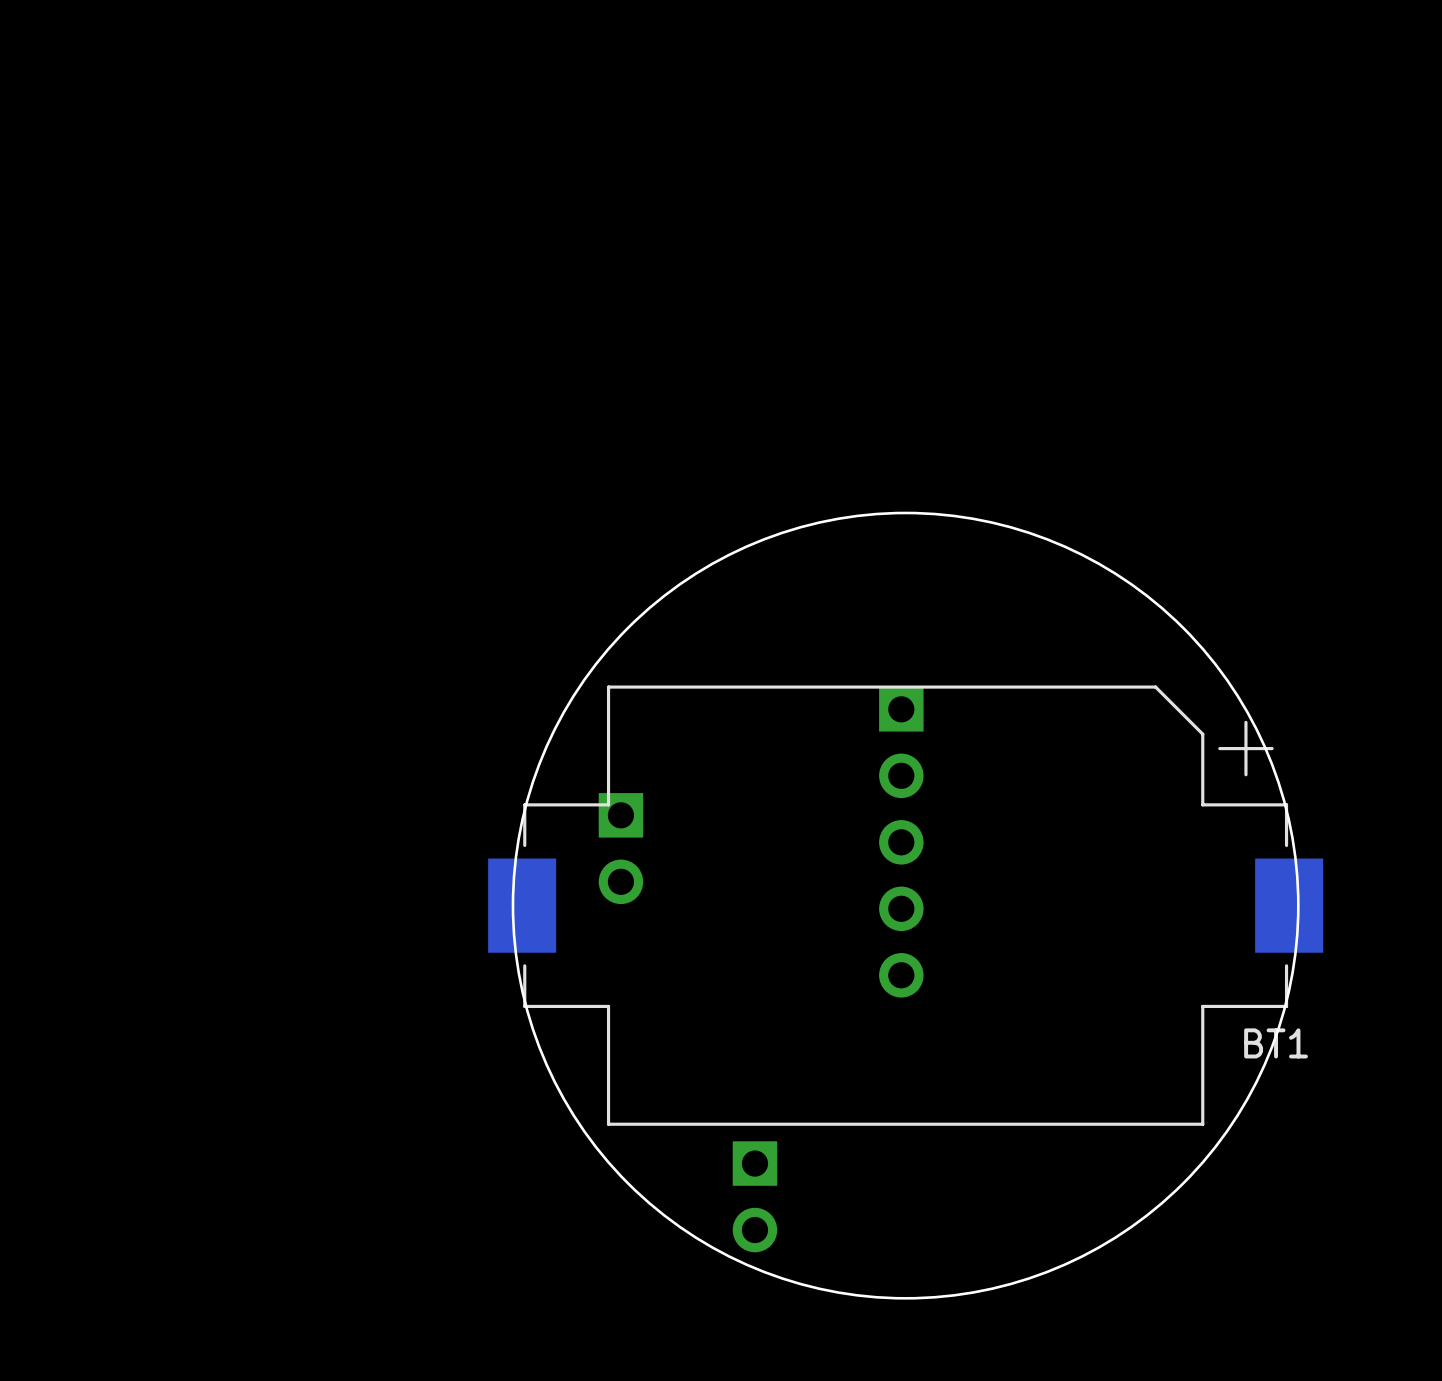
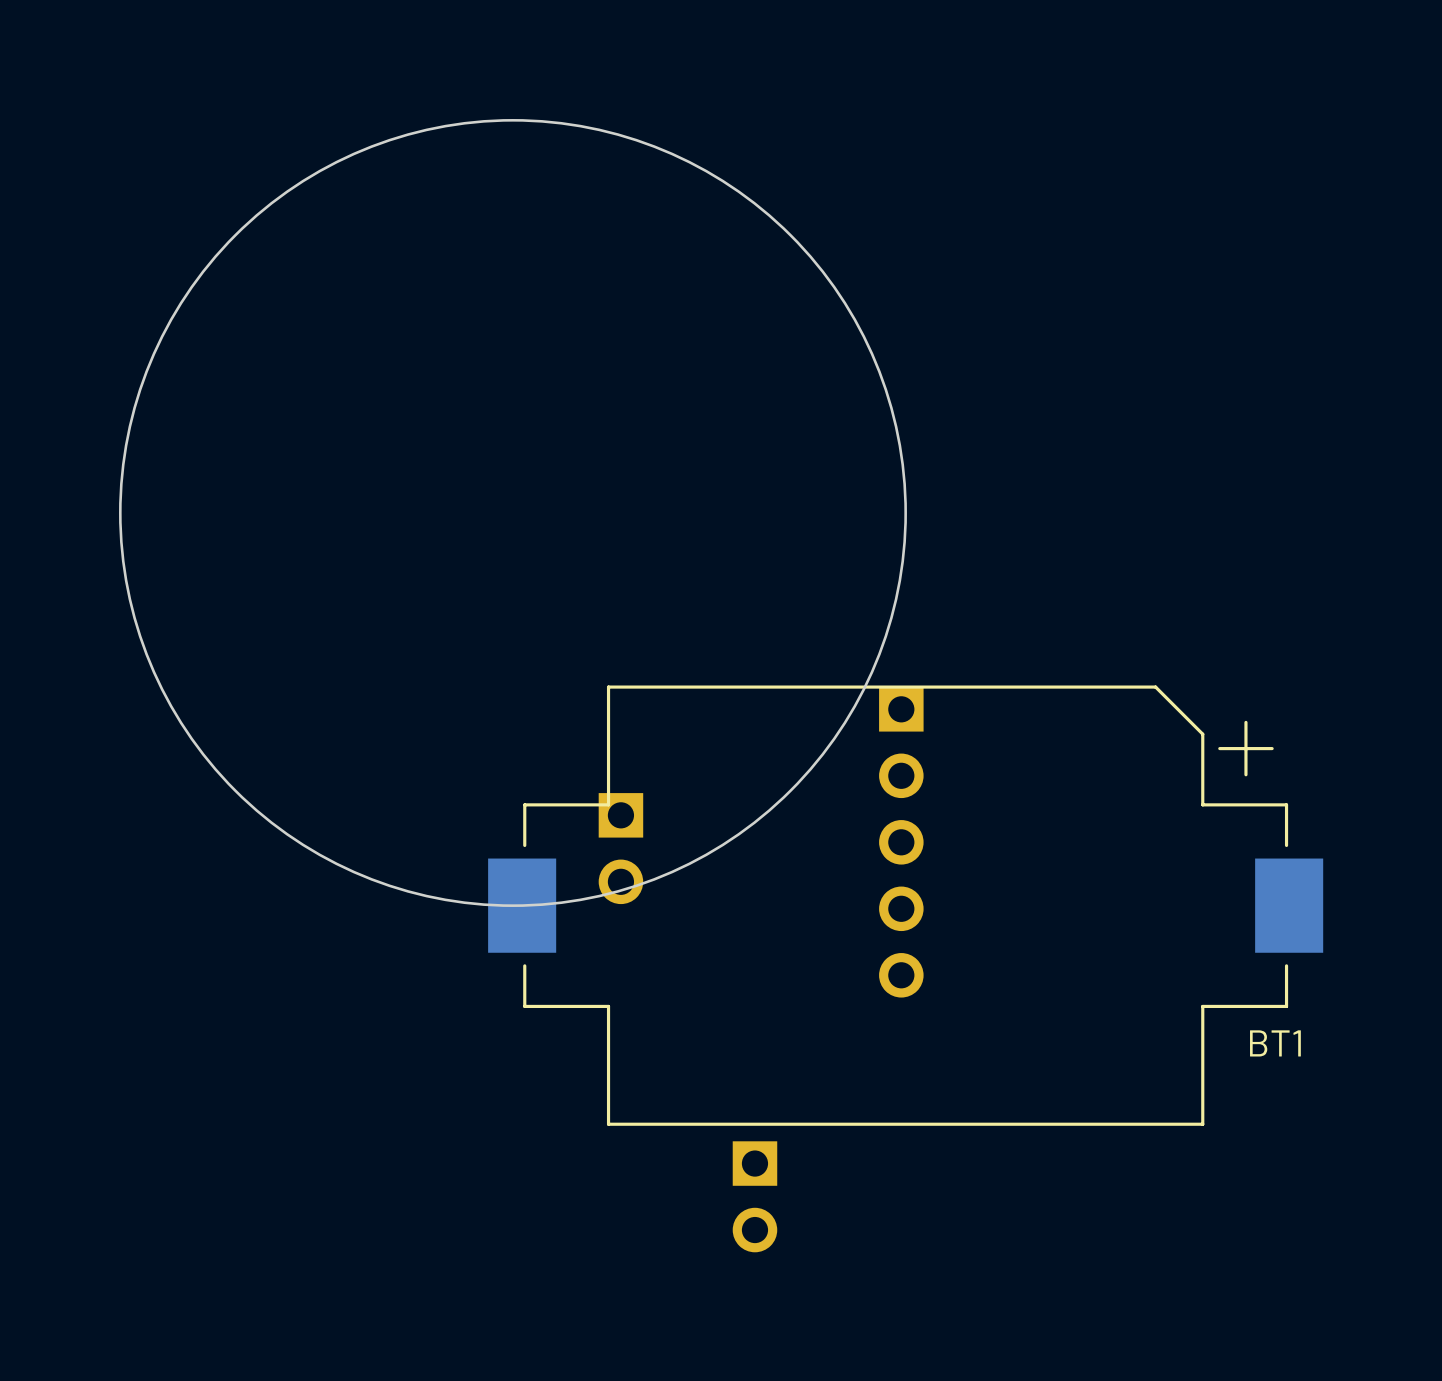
round board edge position: (905, 905) -> (512, 512)

